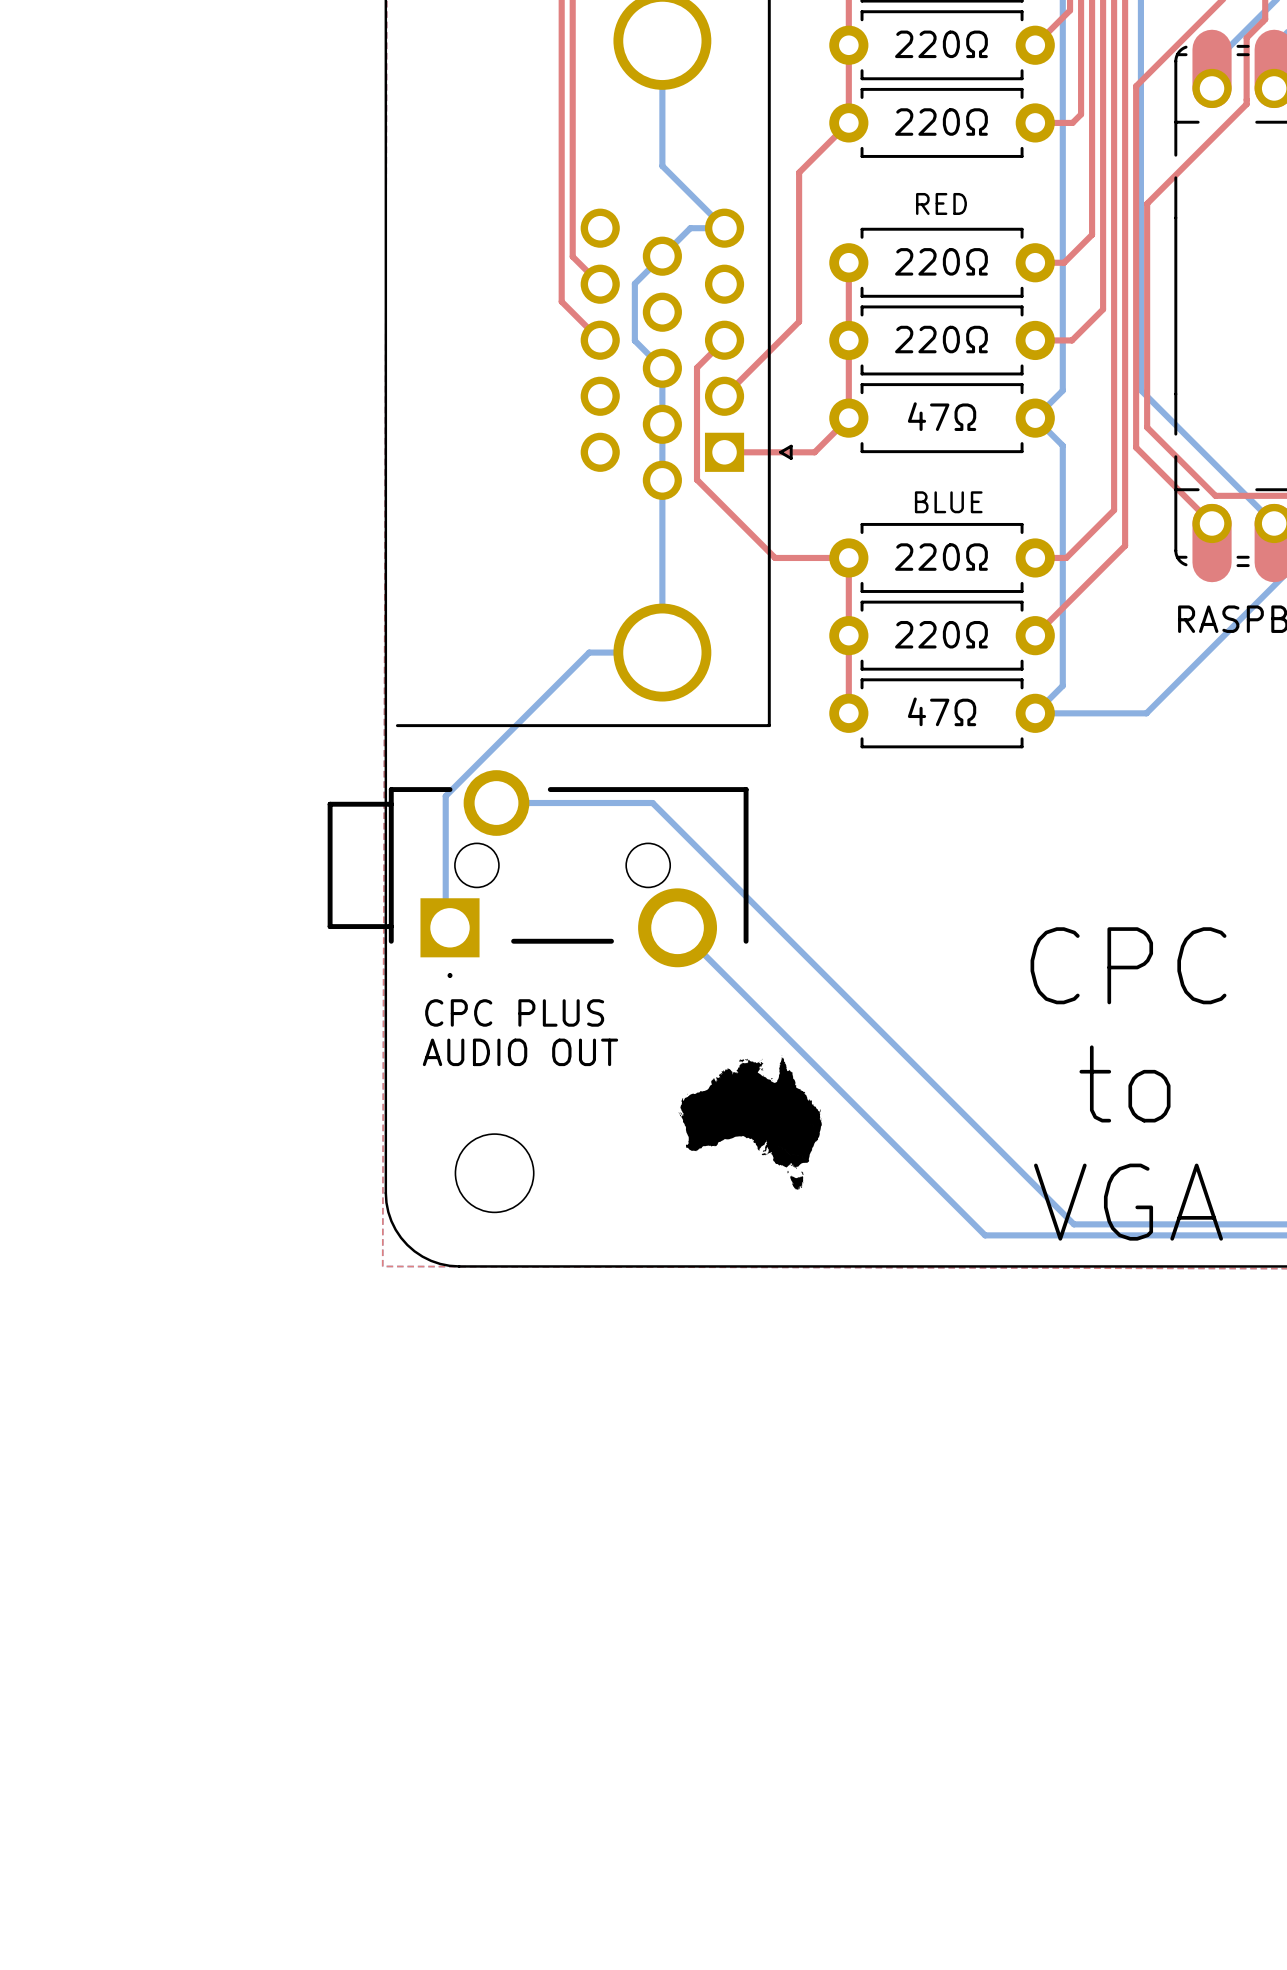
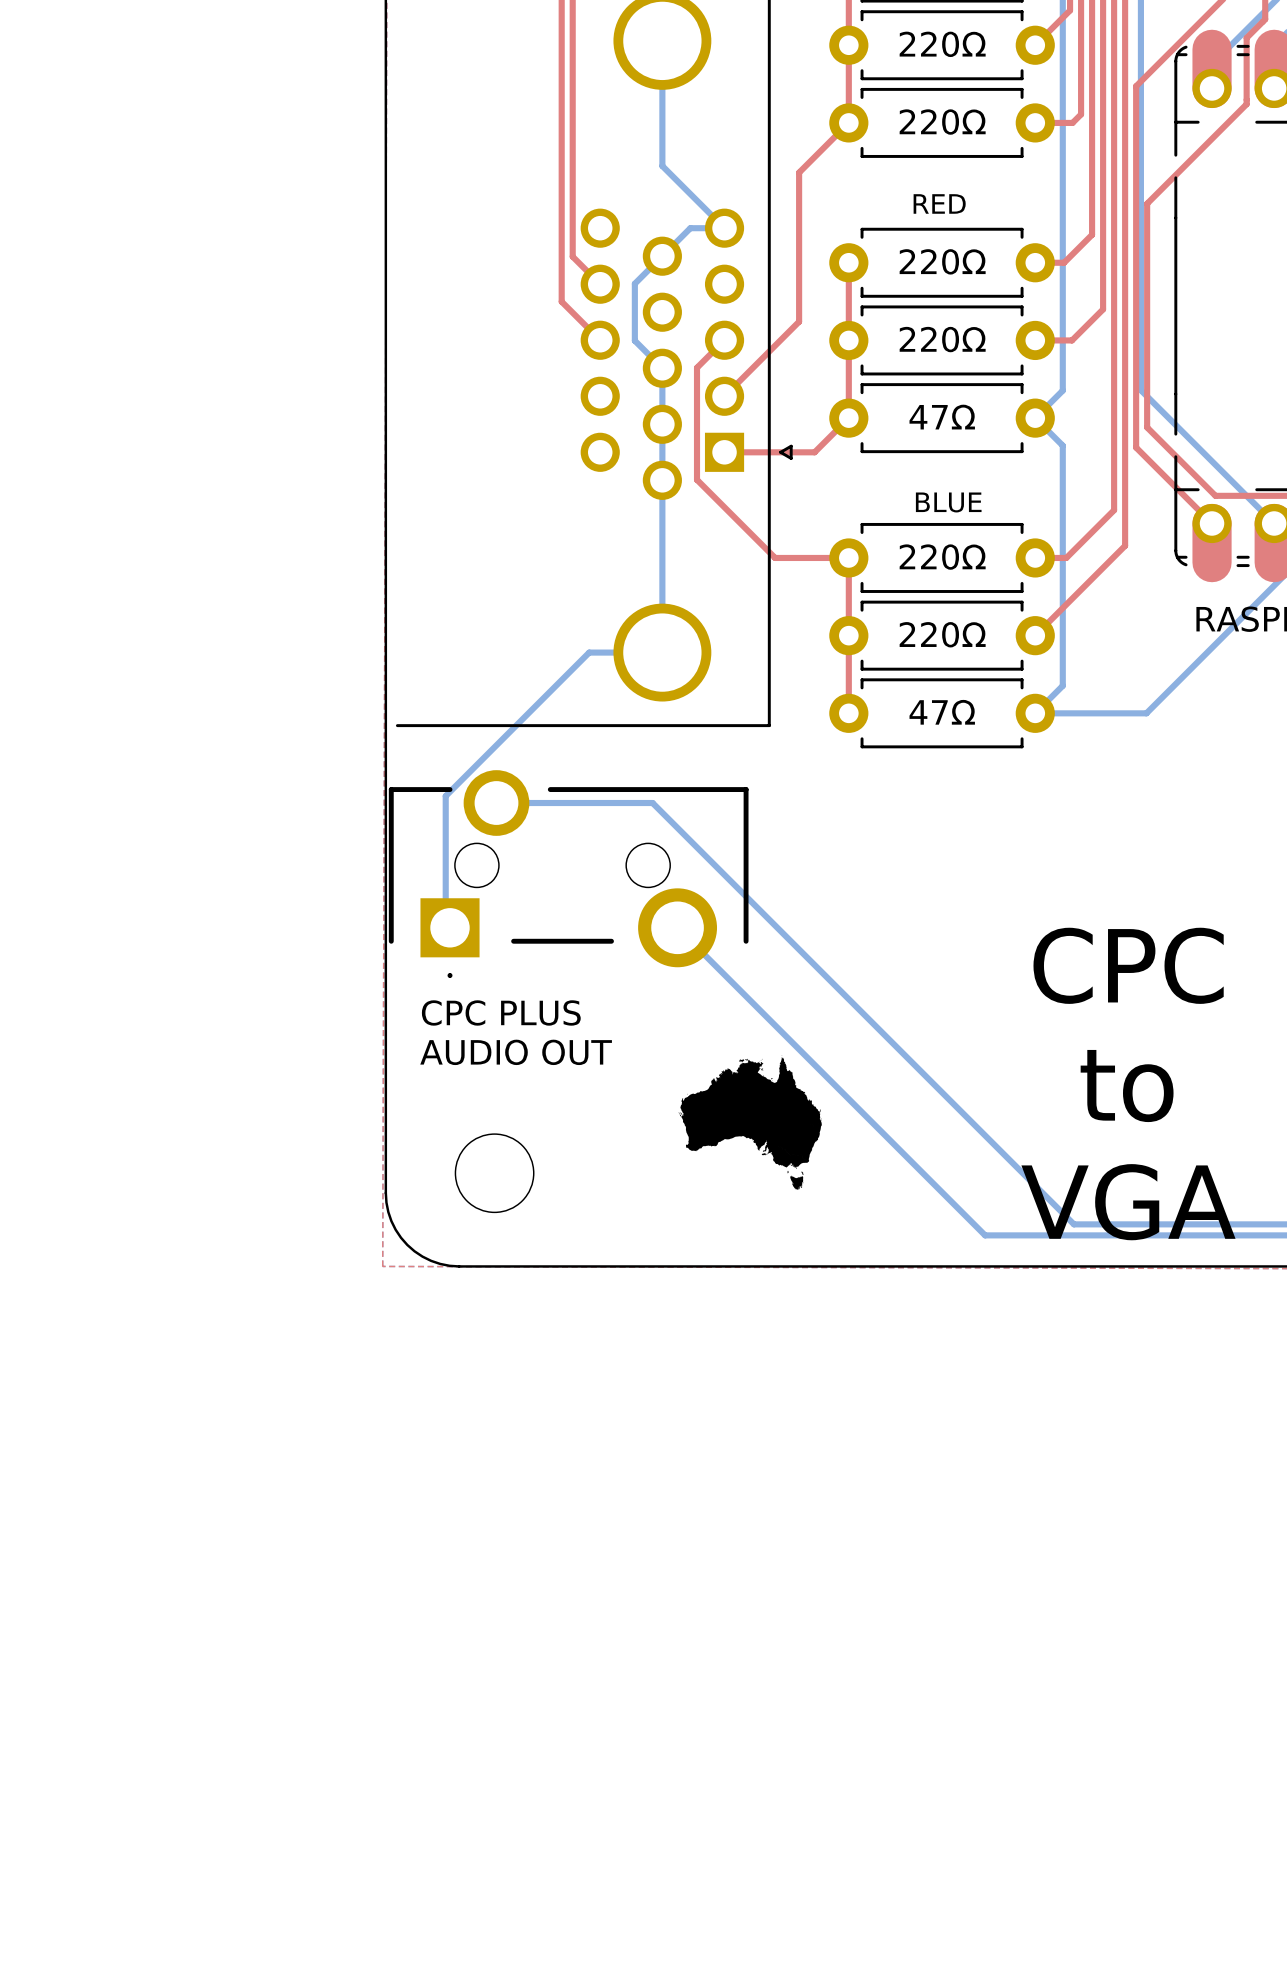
part: (538, 874) -> none
part: none -> (568, 874)

